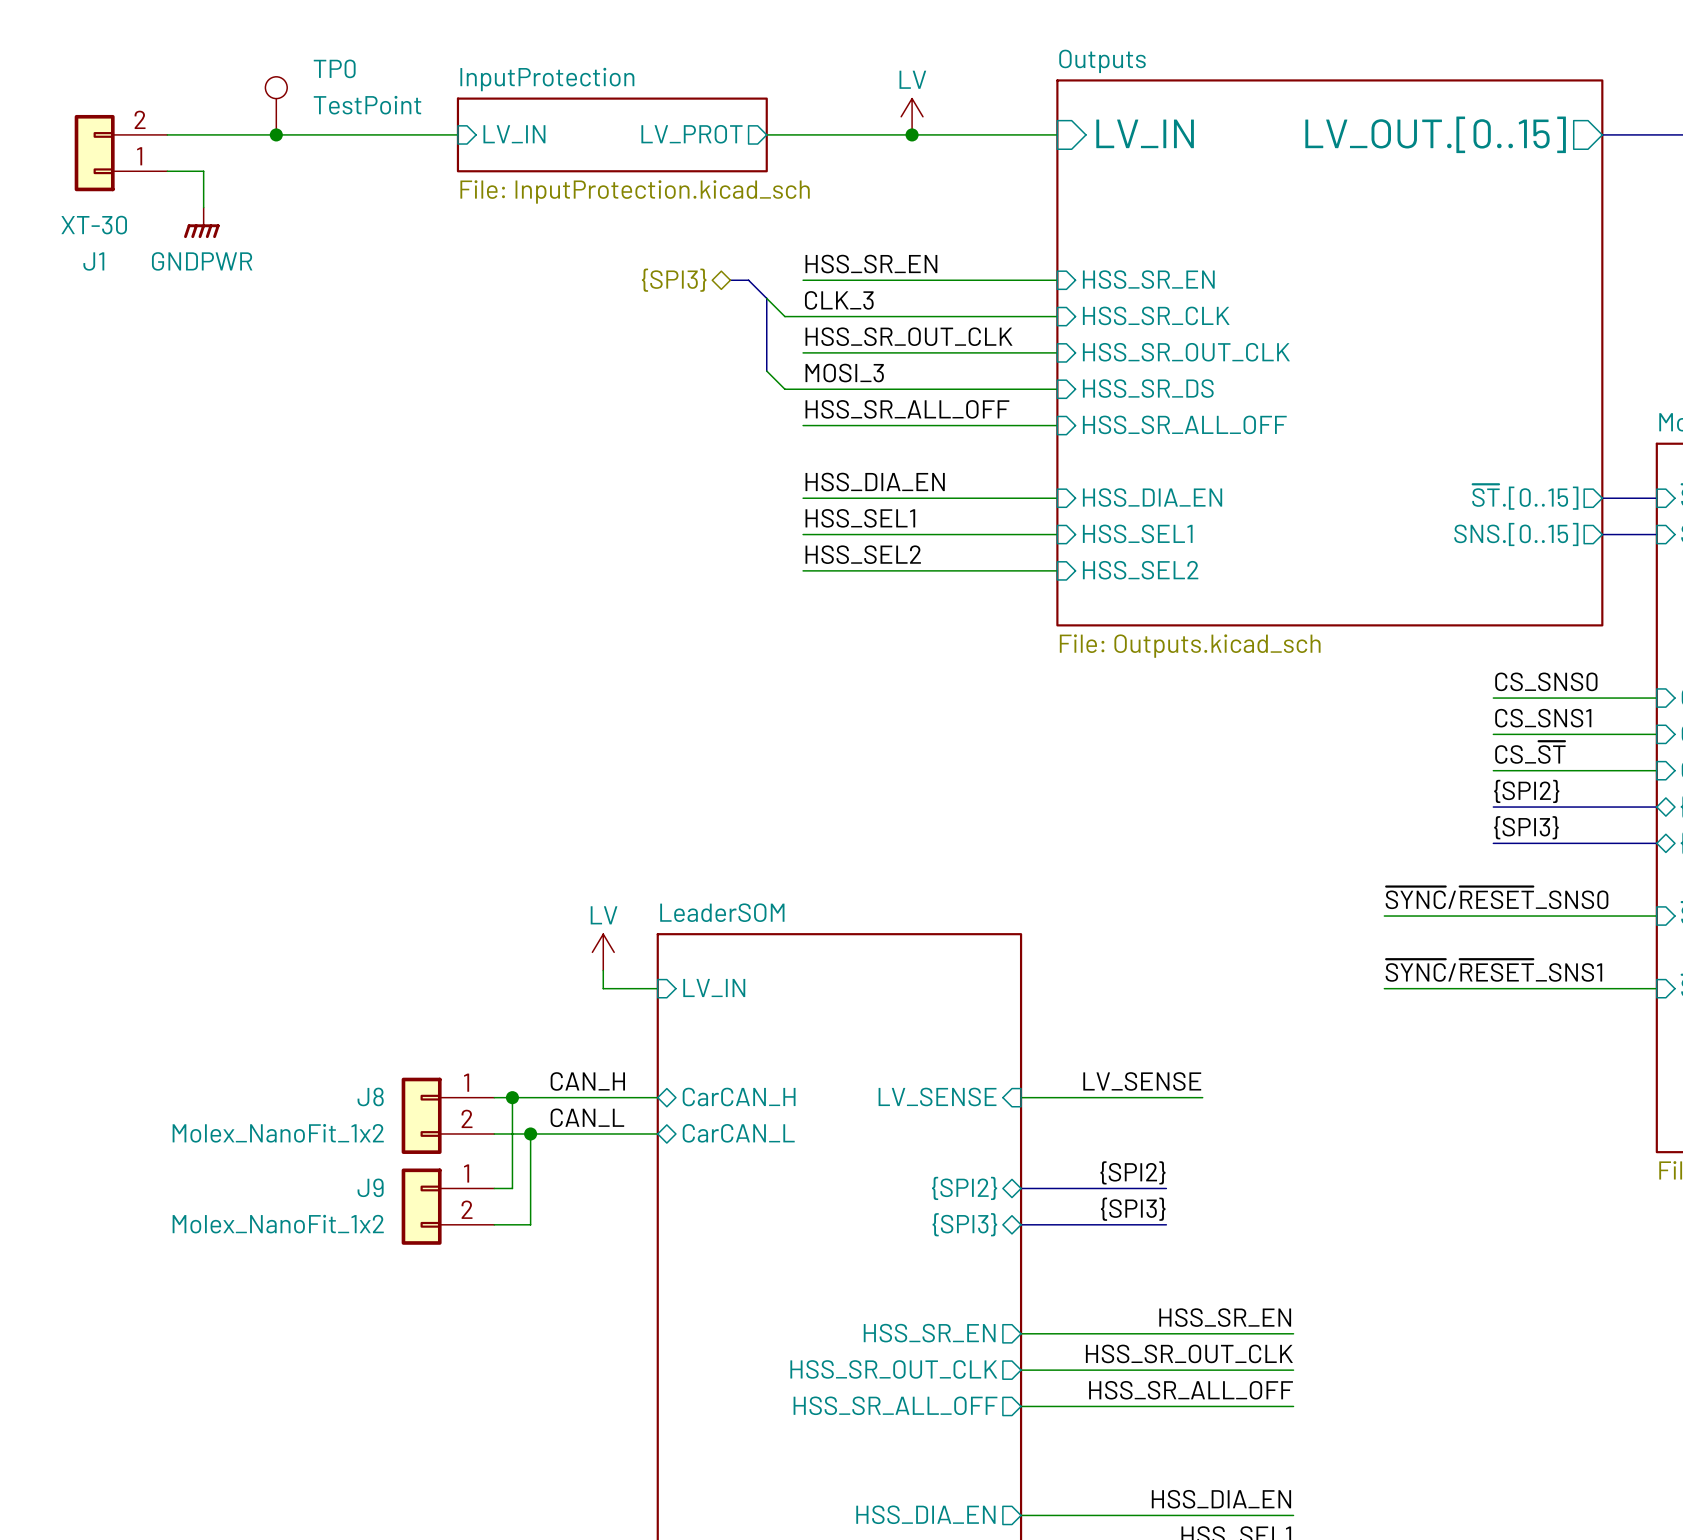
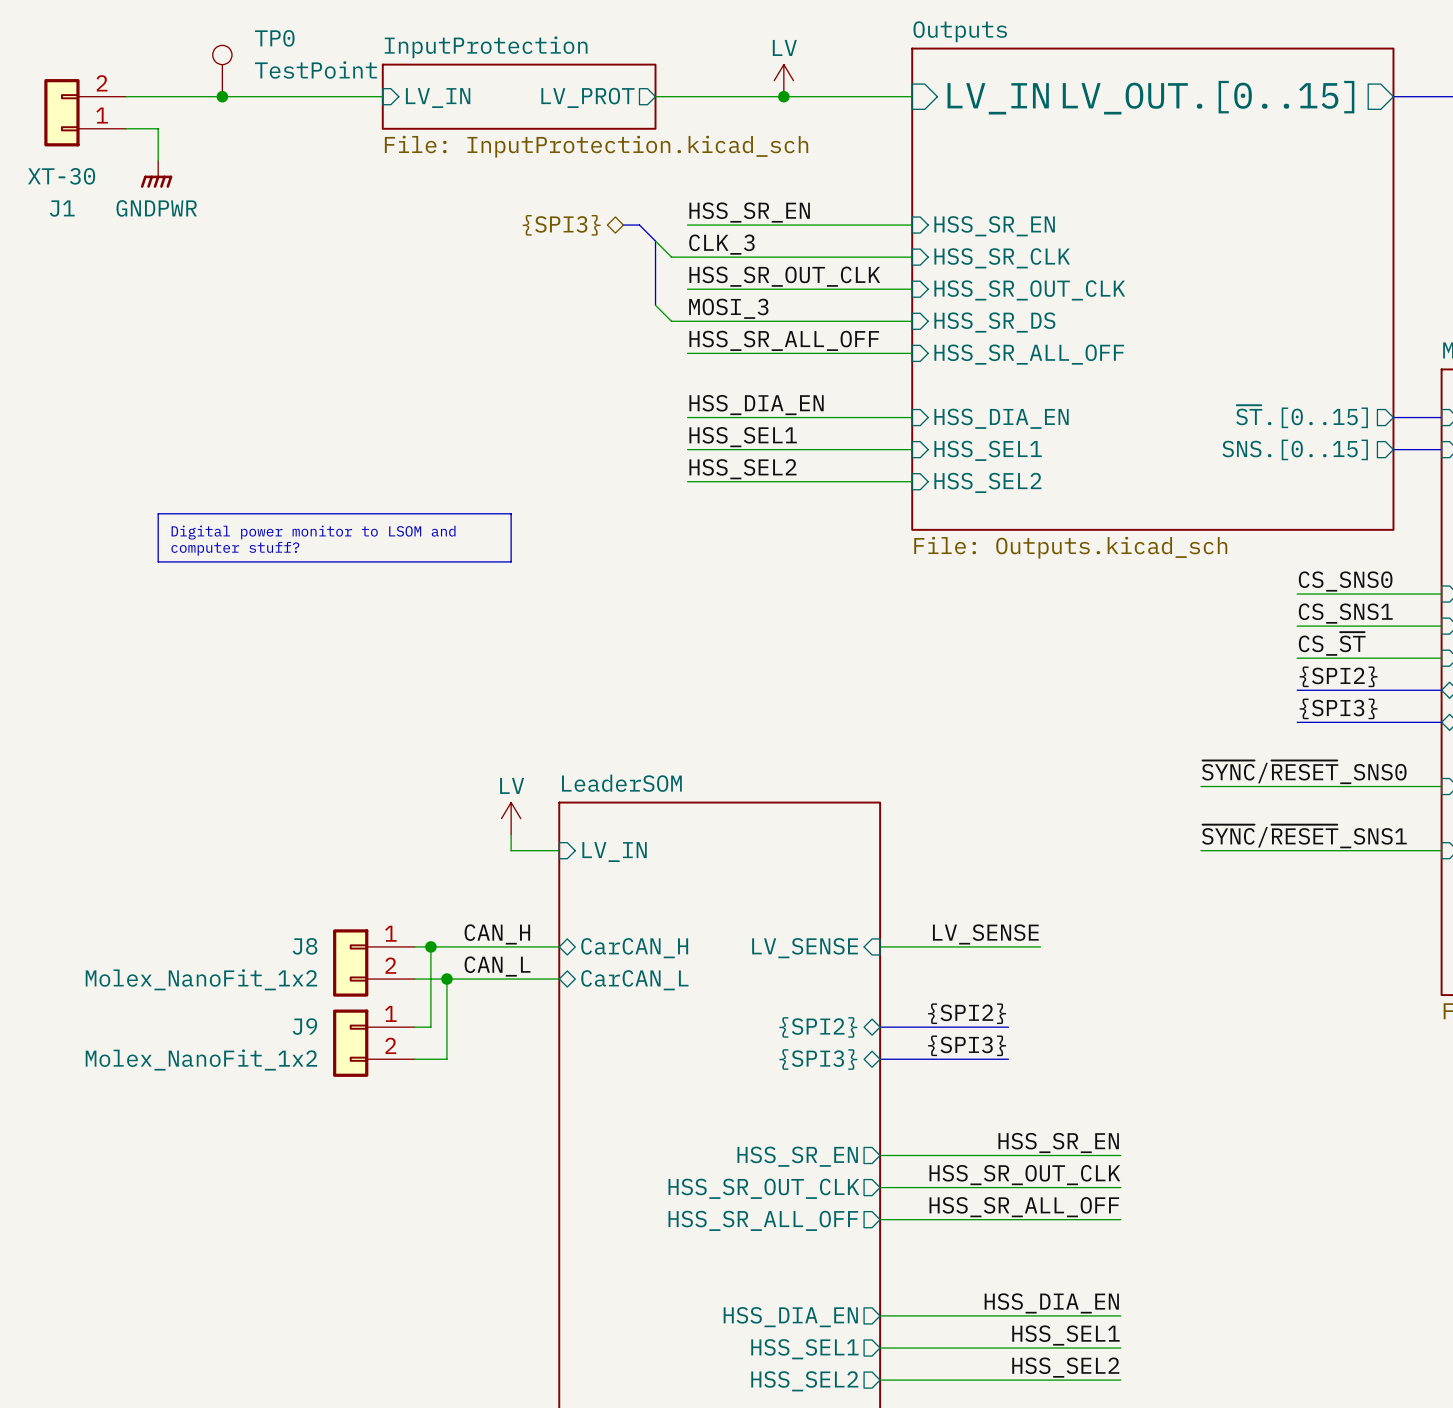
line: none -> (158, 513) (511, 513) (511, 561) (158, 561) (158, 513)
text: none -> Digital power monitor to LSOM and (313, 532)
text: none -> computer stuff? (235, 548)

